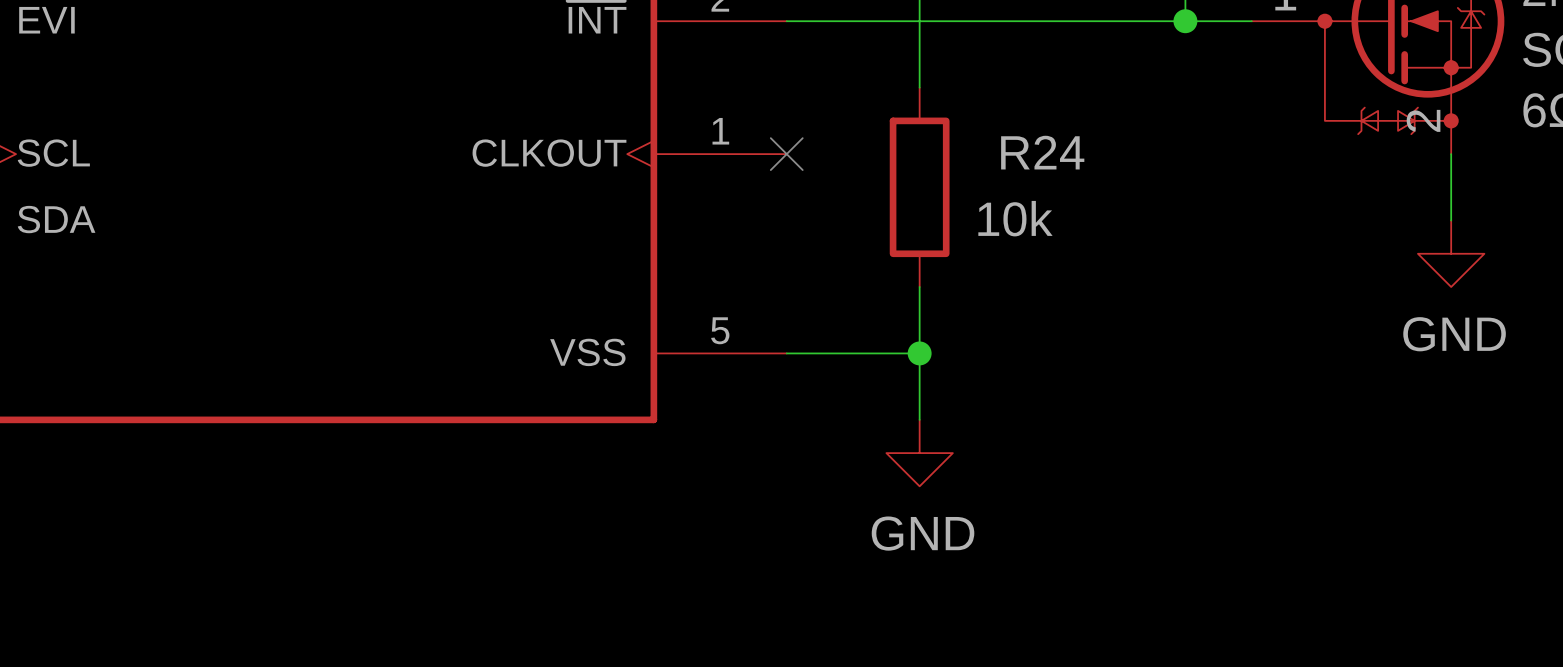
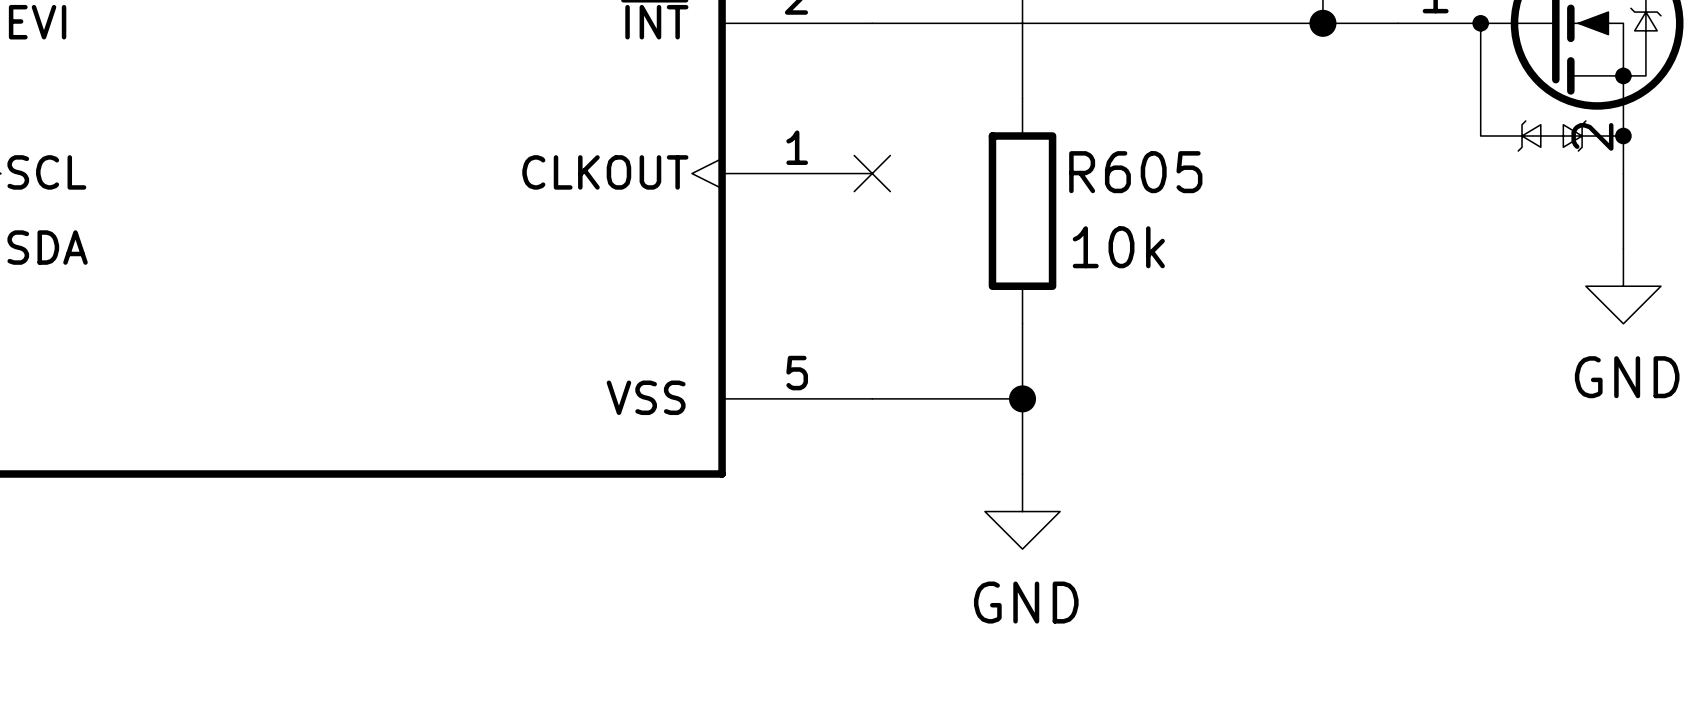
R24 name: R24 (1042, 152) -> R605 (1135, 172)

